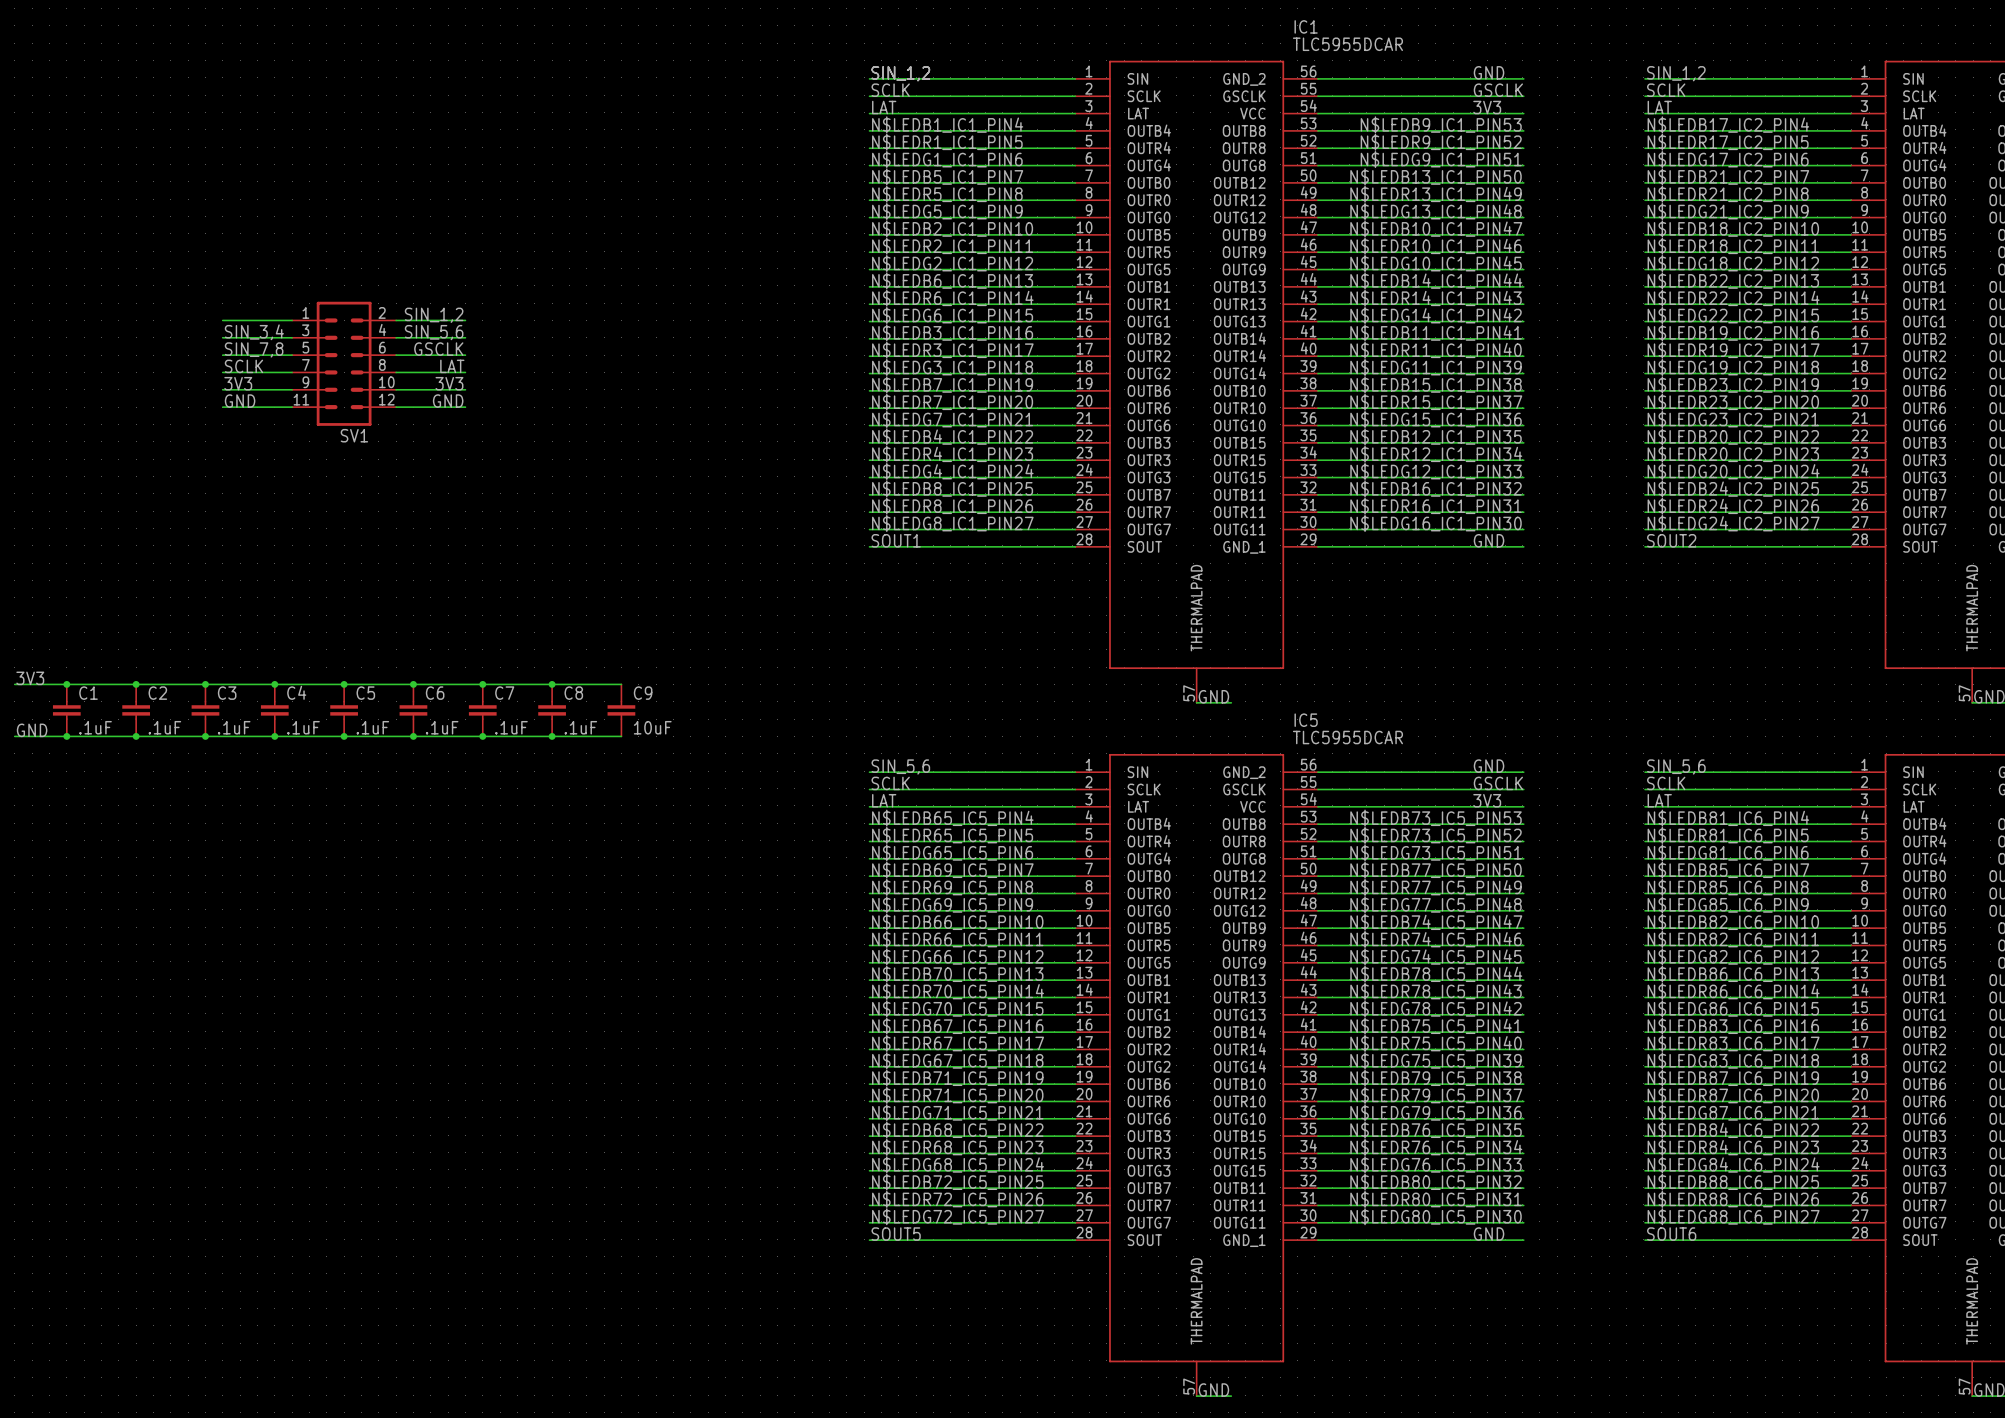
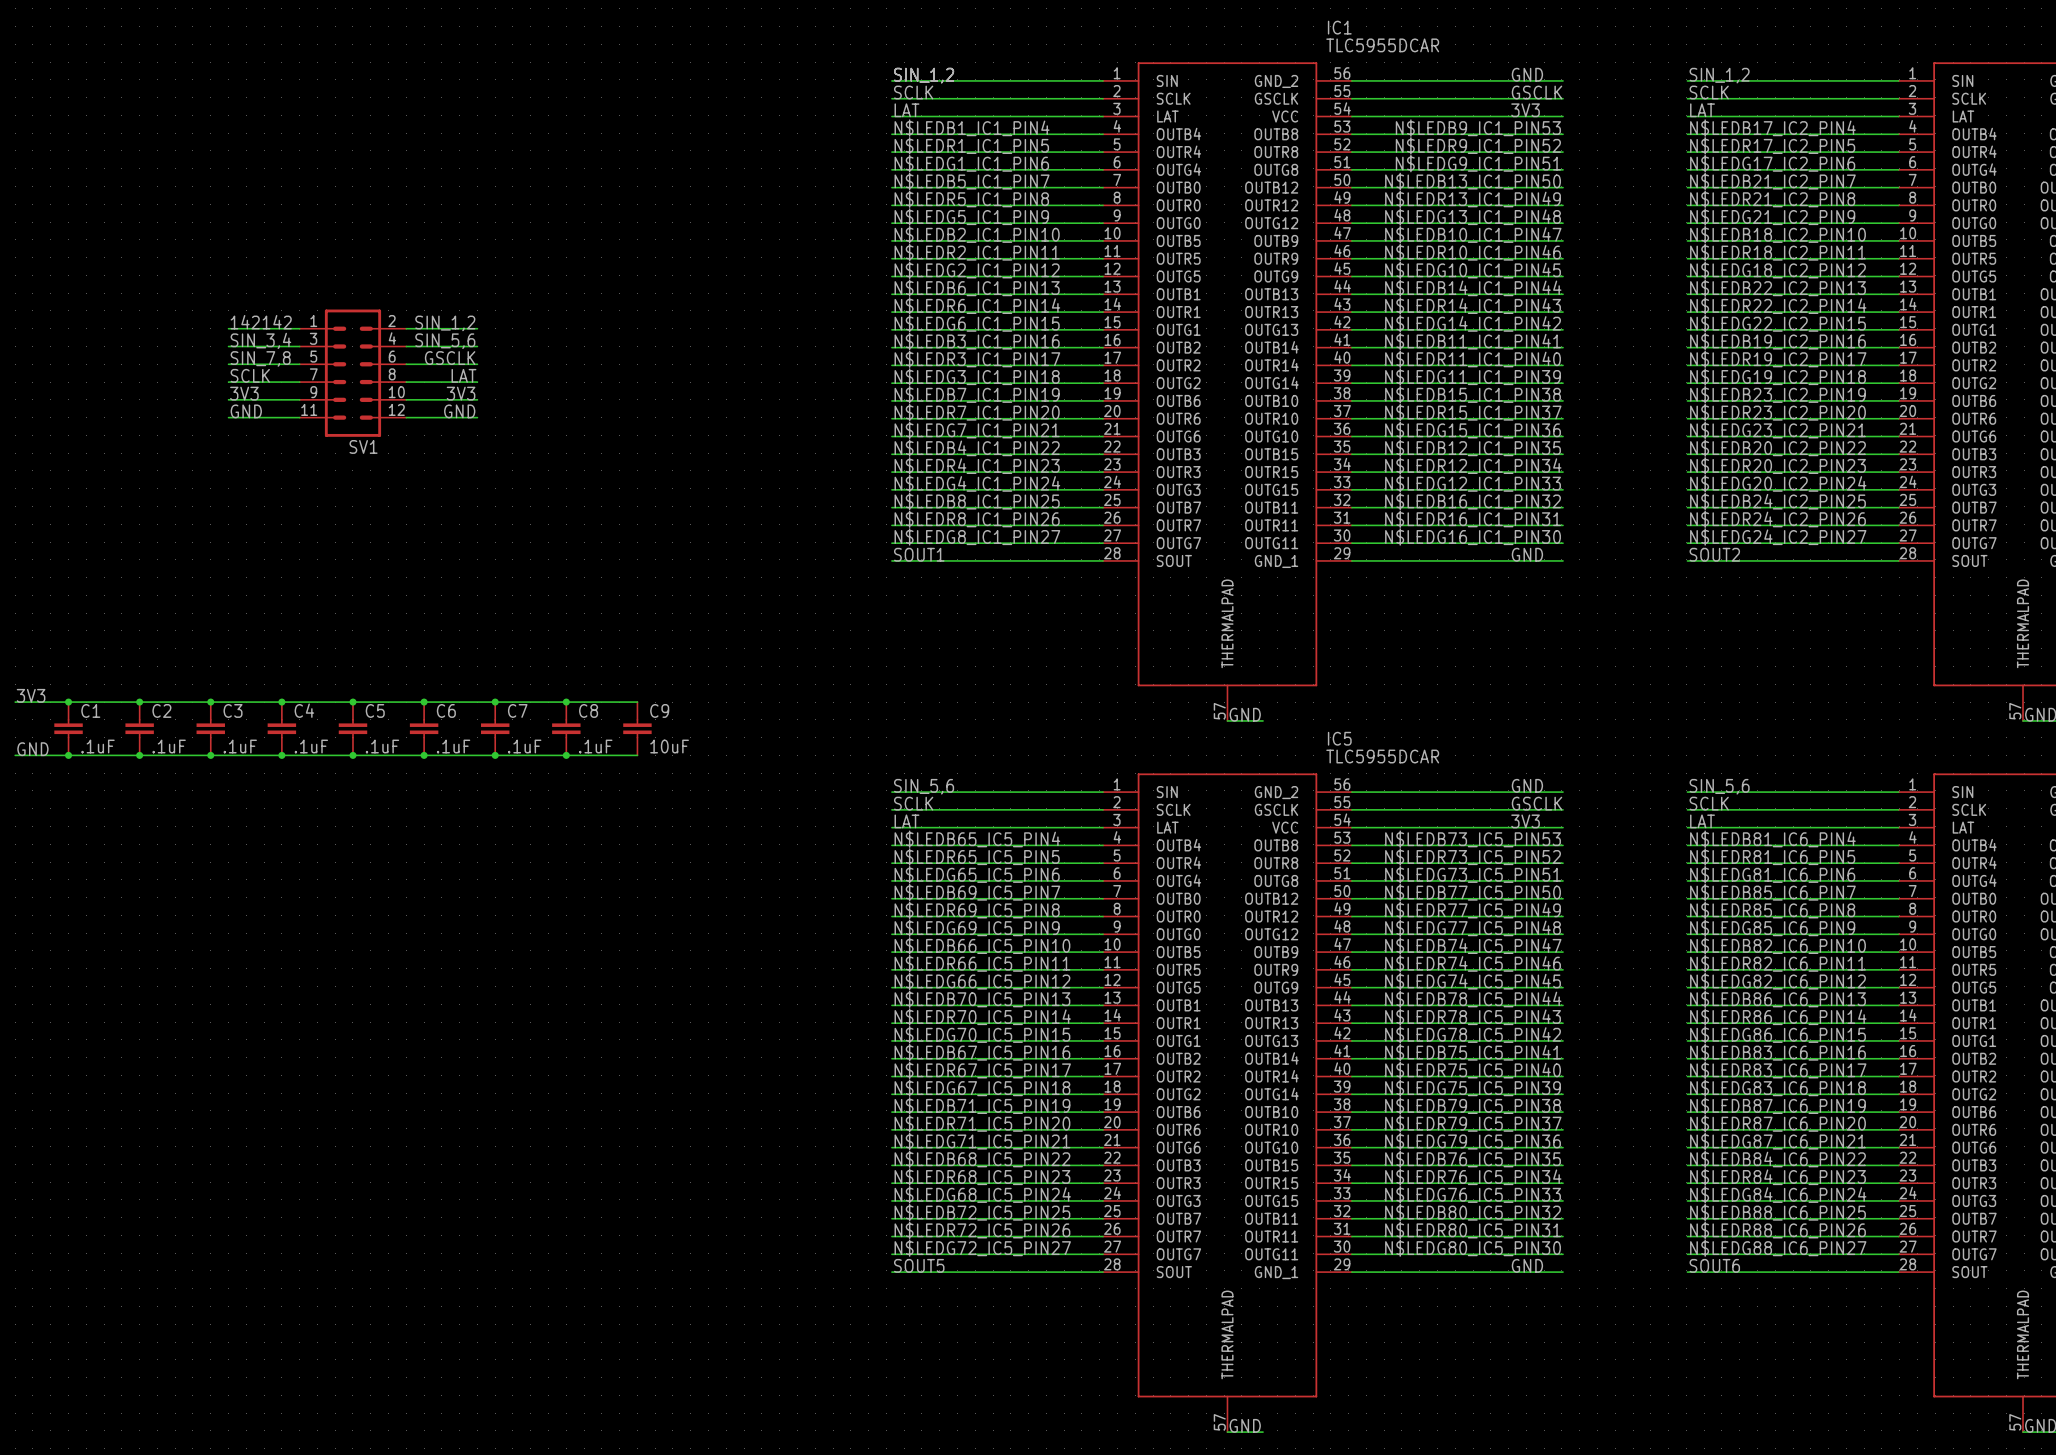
label: none -> 142142 (261, 322)

